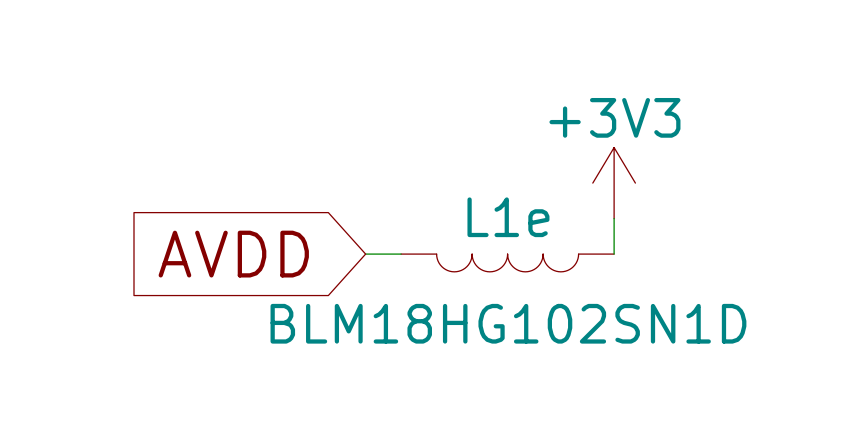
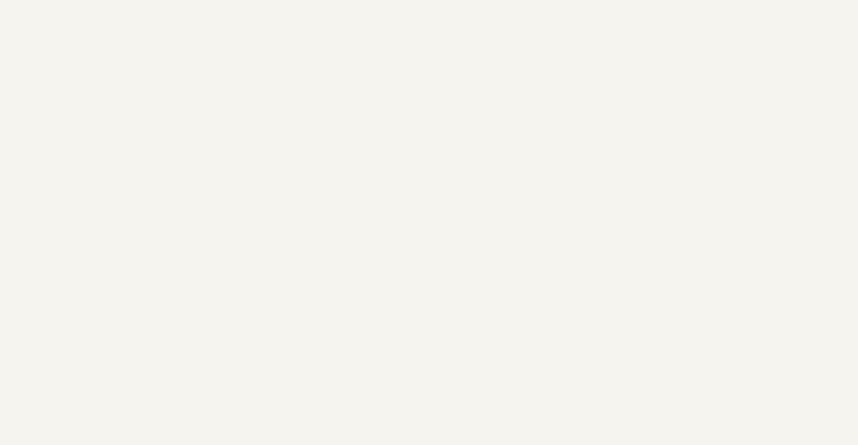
power symbol: +3V3 (614, 183) -> none
wire: (614, 218) (614, 254) -> none
global label: AVDD (233, 254) -> none
wire: (365, 254) (401, 254) -> none
L1e: BLM18HG102SN1D (507, 262) -> none

